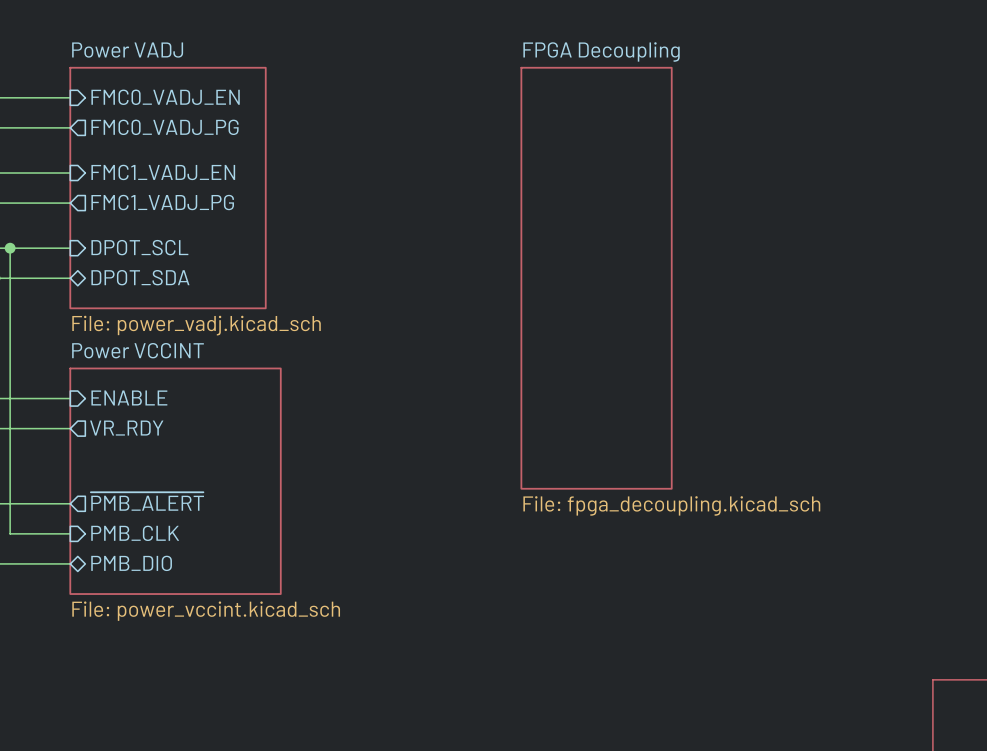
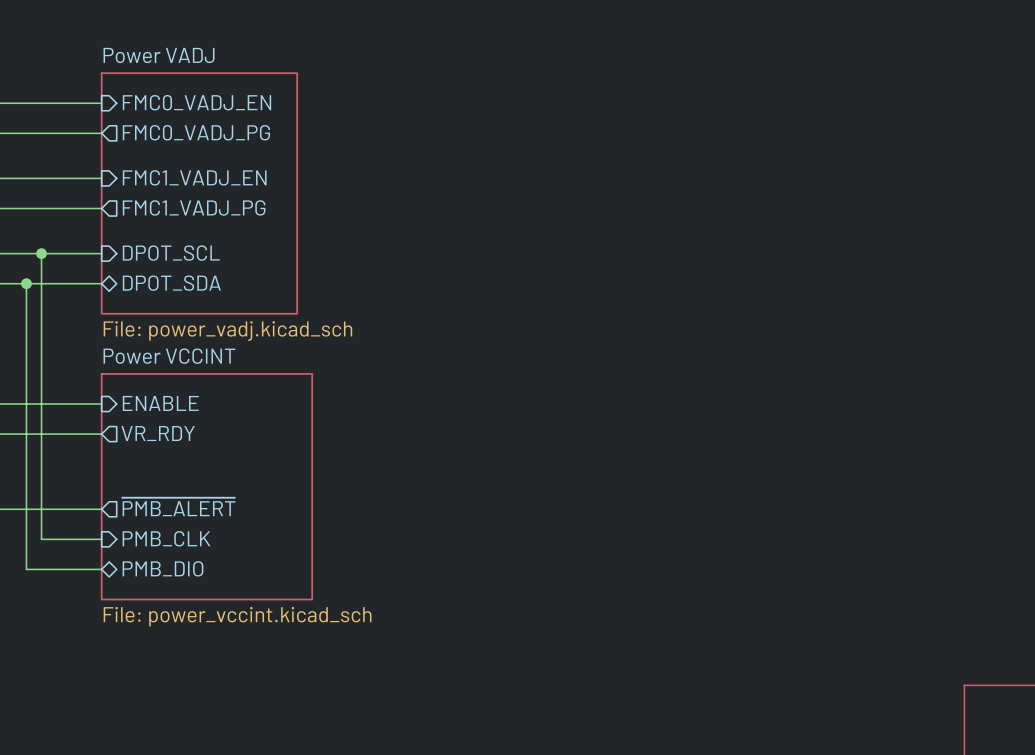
sheet FPGA Decoupling: File: fpga_decoupling.kicad_sch (596, 278) -> none

